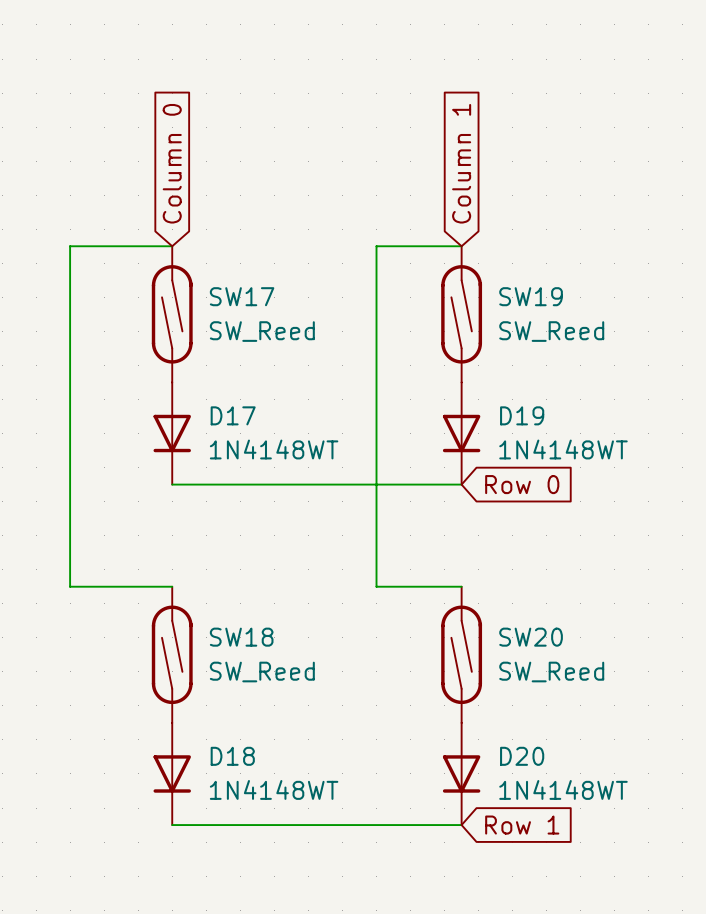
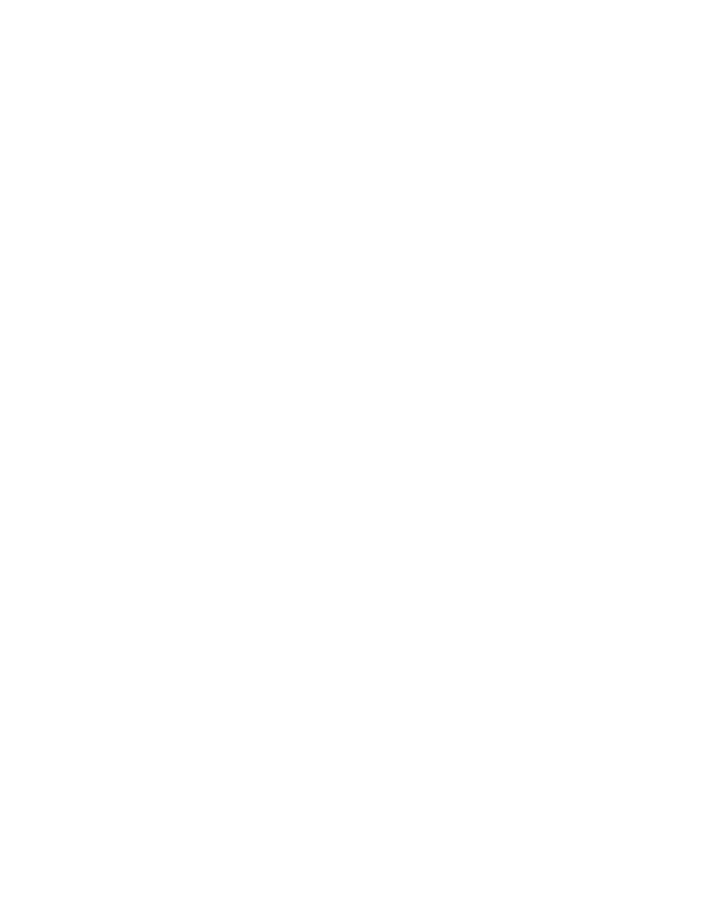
global label: Column 0 (172, 163) -> none
global label: Column 1 (461, 163) -> none
wire: (172, 246) (70, 246) (70, 586) (172, 586) -> none
wire: (461, 246) (376, 246) (376, 586) (461, 586) -> none
SW17: SW_Reed (172, 314) -> none
SW19: SW_Reed (461, 314) -> none
D17: 1N4148WT (172, 433) -> none
D19: 1N4148WT (461, 433) -> none
wire: (172, 484) (461, 484) -> none
global label: Row 0 (522, 484) -> none
SW18: SW_Reed (172, 654) -> none
SW20: SW_Reed (461, 654) -> none
D18: 1N4148WT (172, 773) -> none
D20: 1N4148WT (461, 773) -> none
wire: (172, 825) (461, 825) -> none
global label: Row 1 (522, 825) -> none

